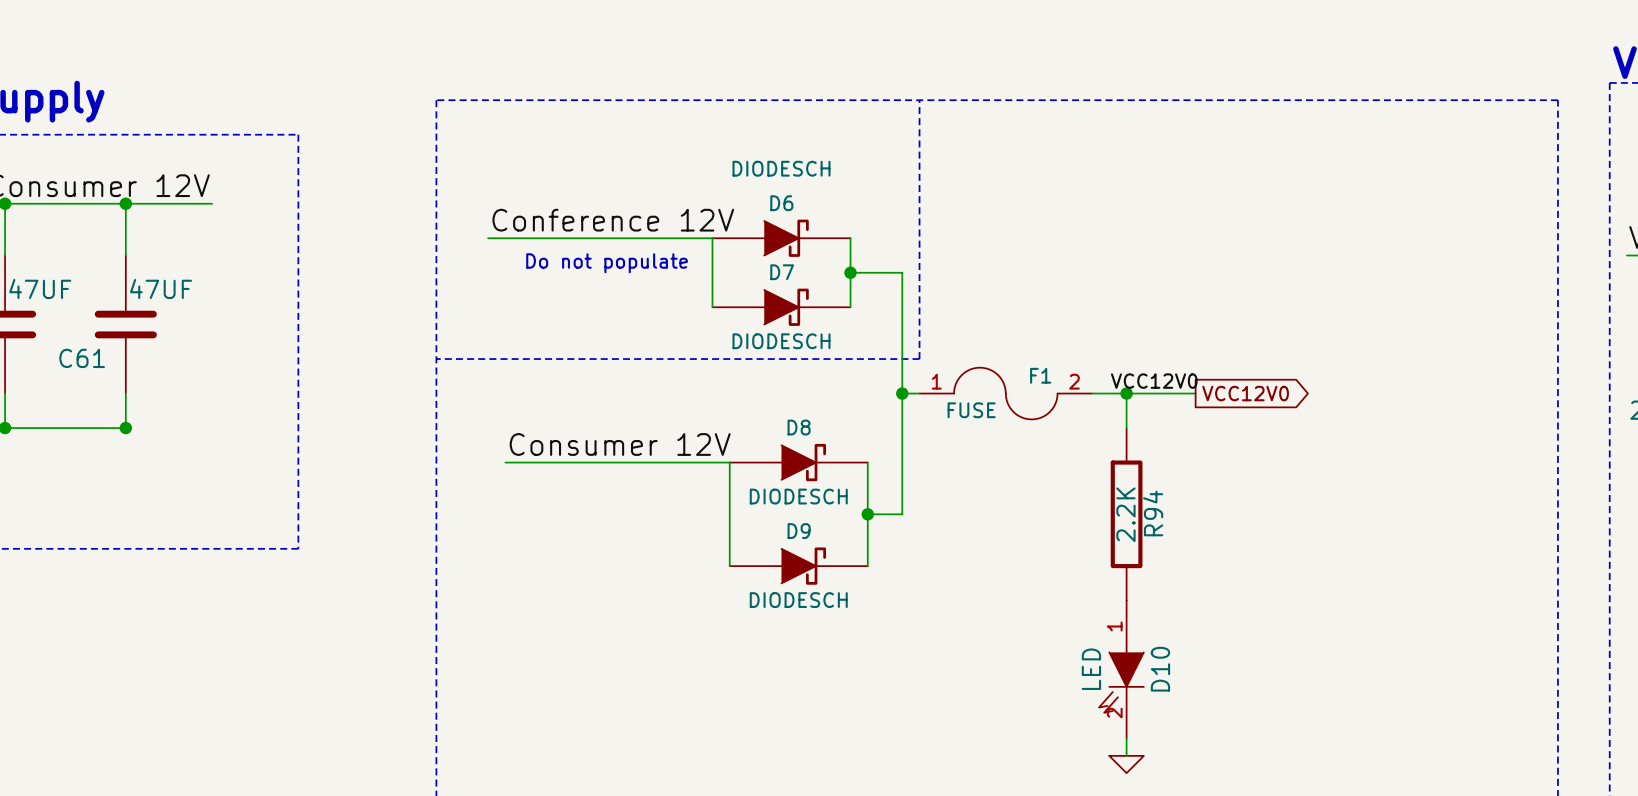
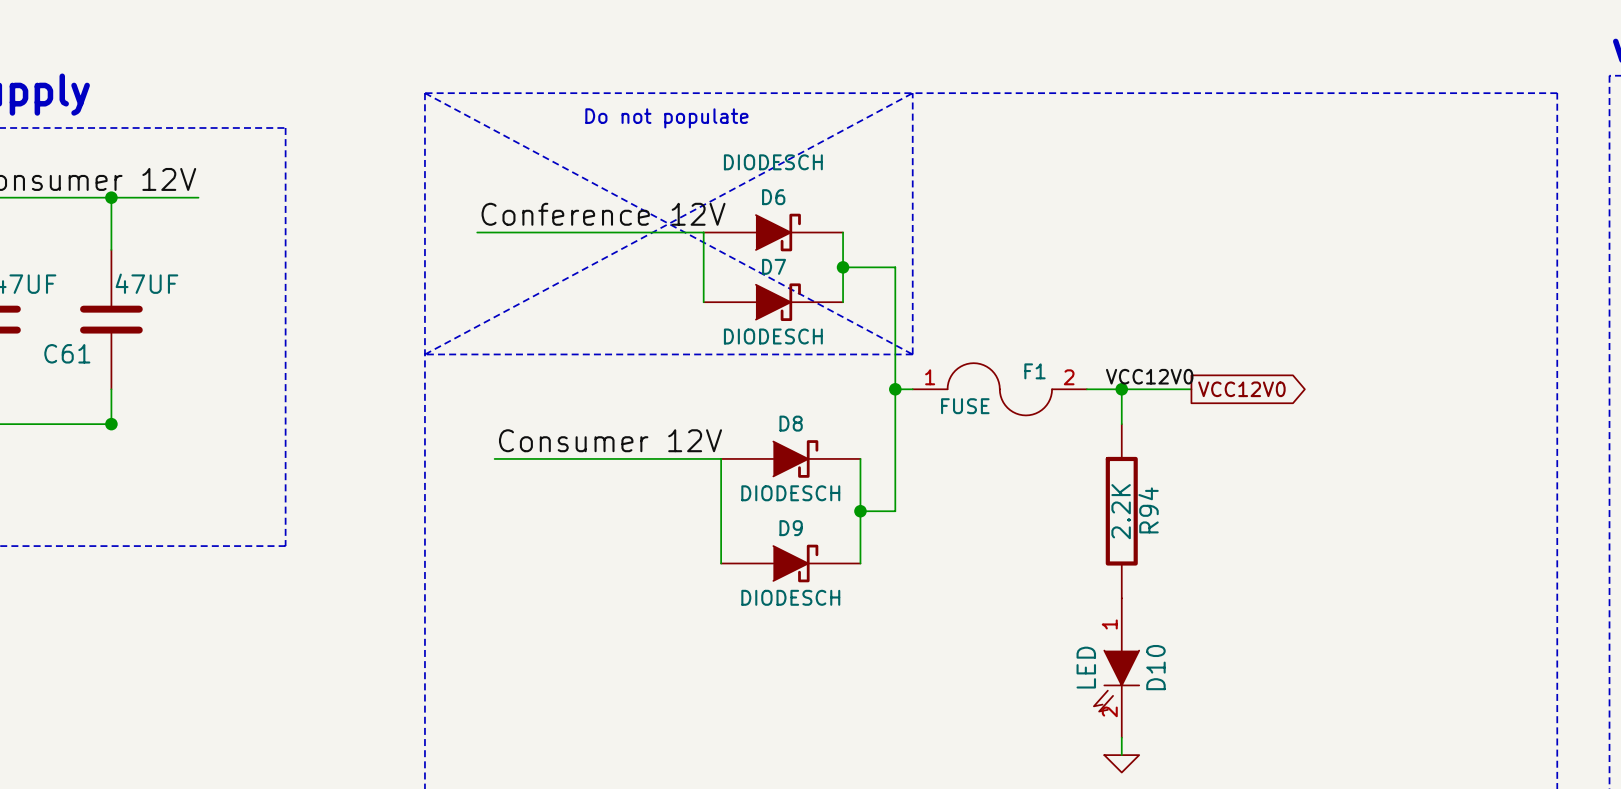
line: none -> (424, 93) (912, 354)
line: none -> (912, 93) (424, 354)
text position: Do not populate (607, 263) -> Do not populate (666, 118)

